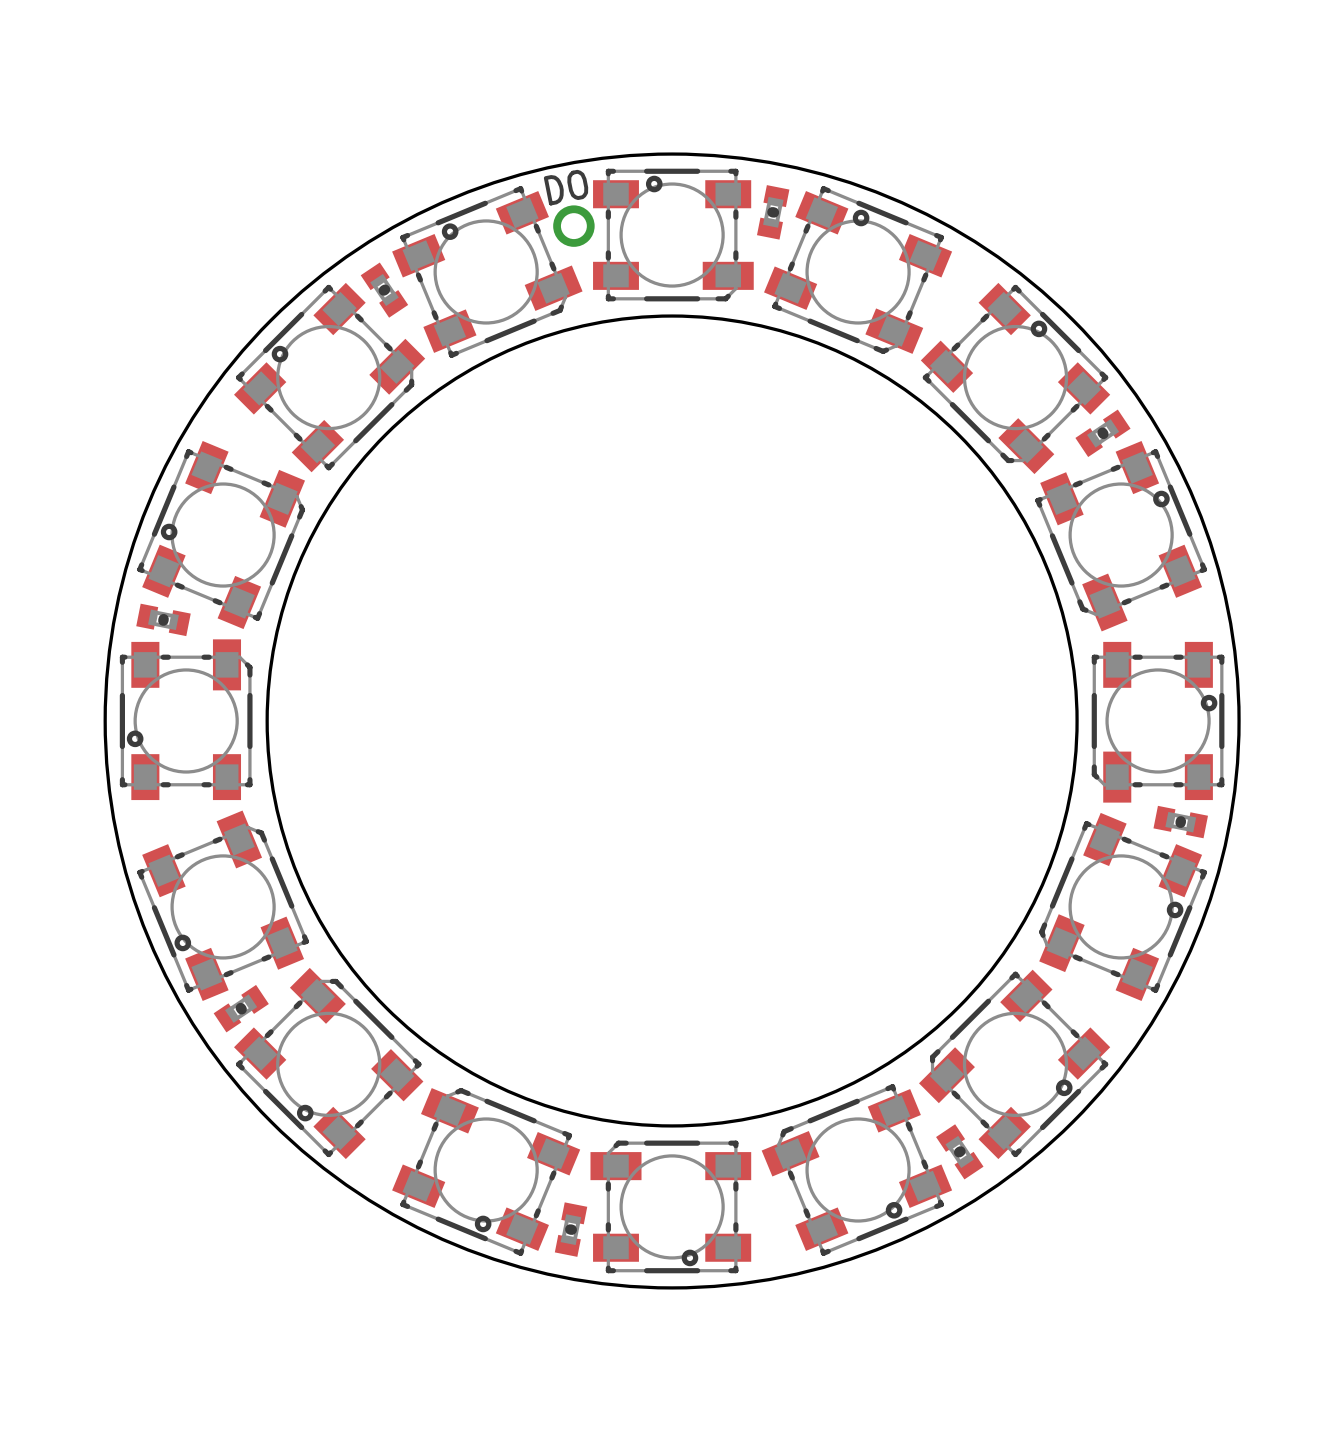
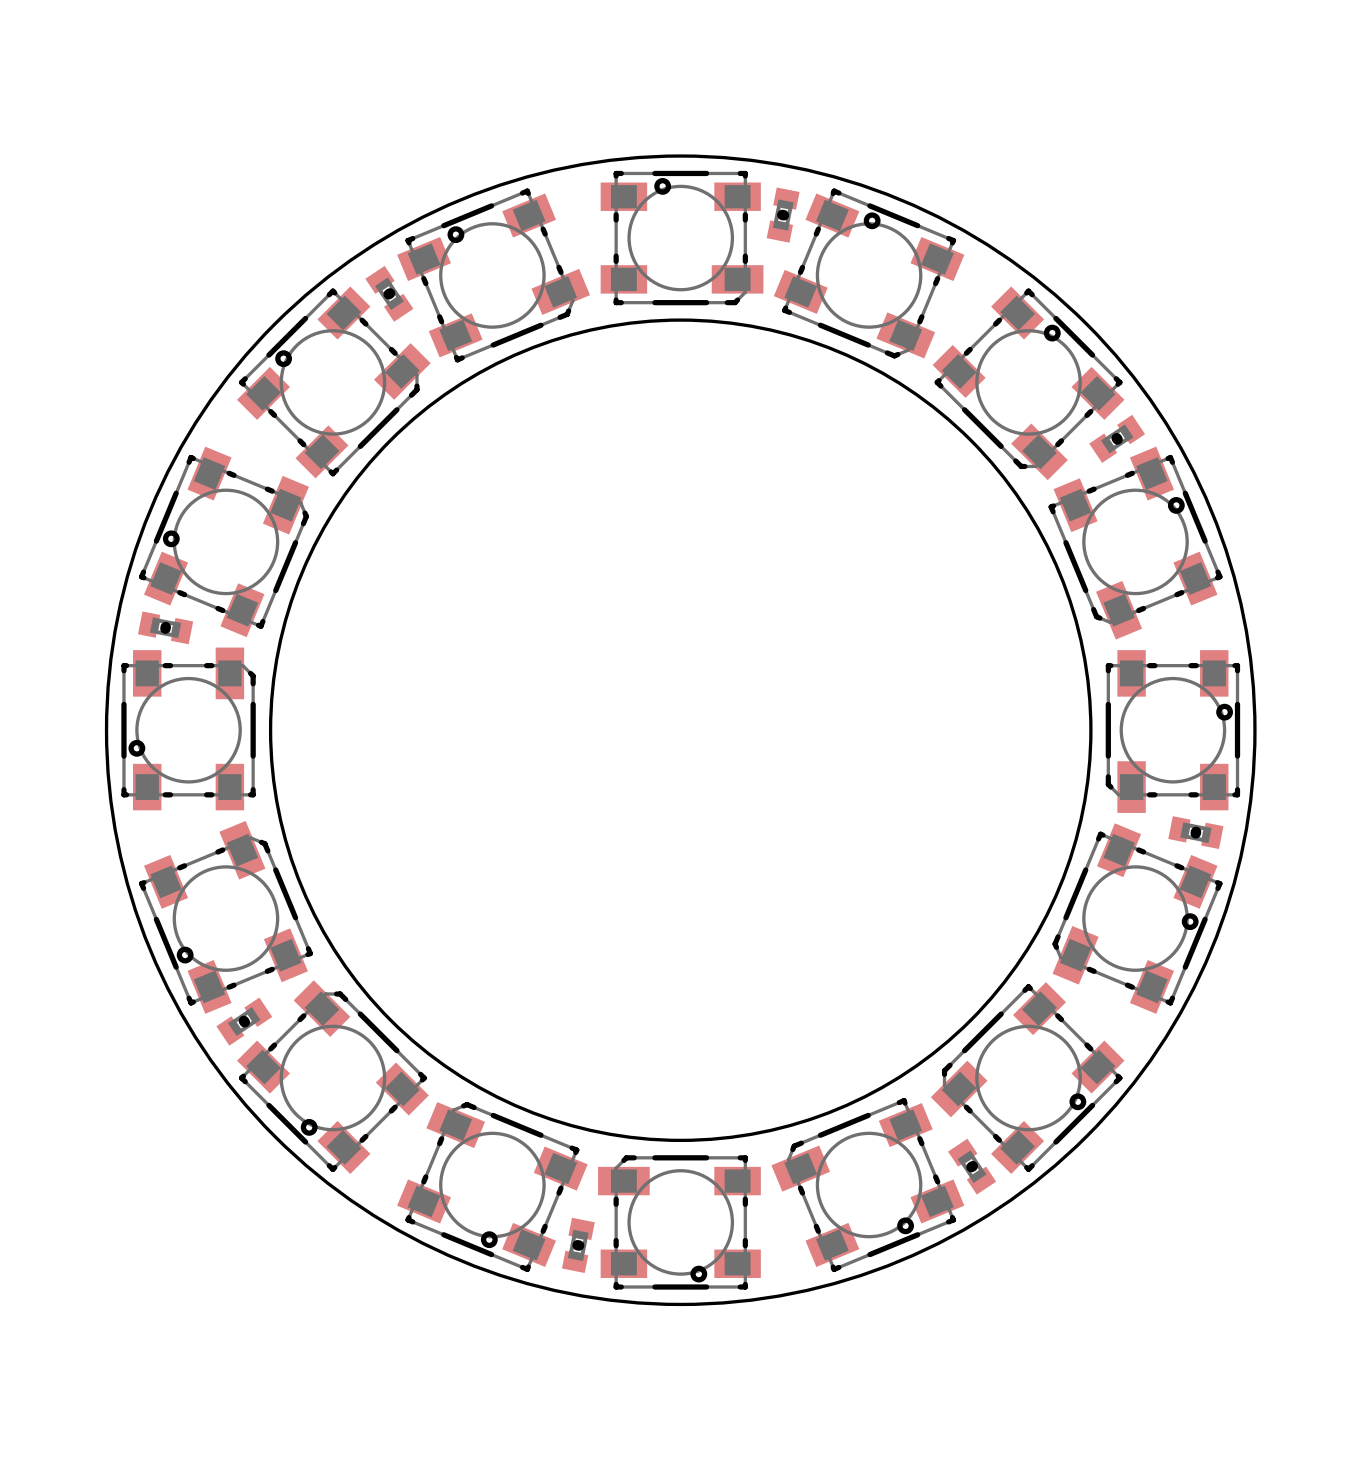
DO: (573, 226) -> none

